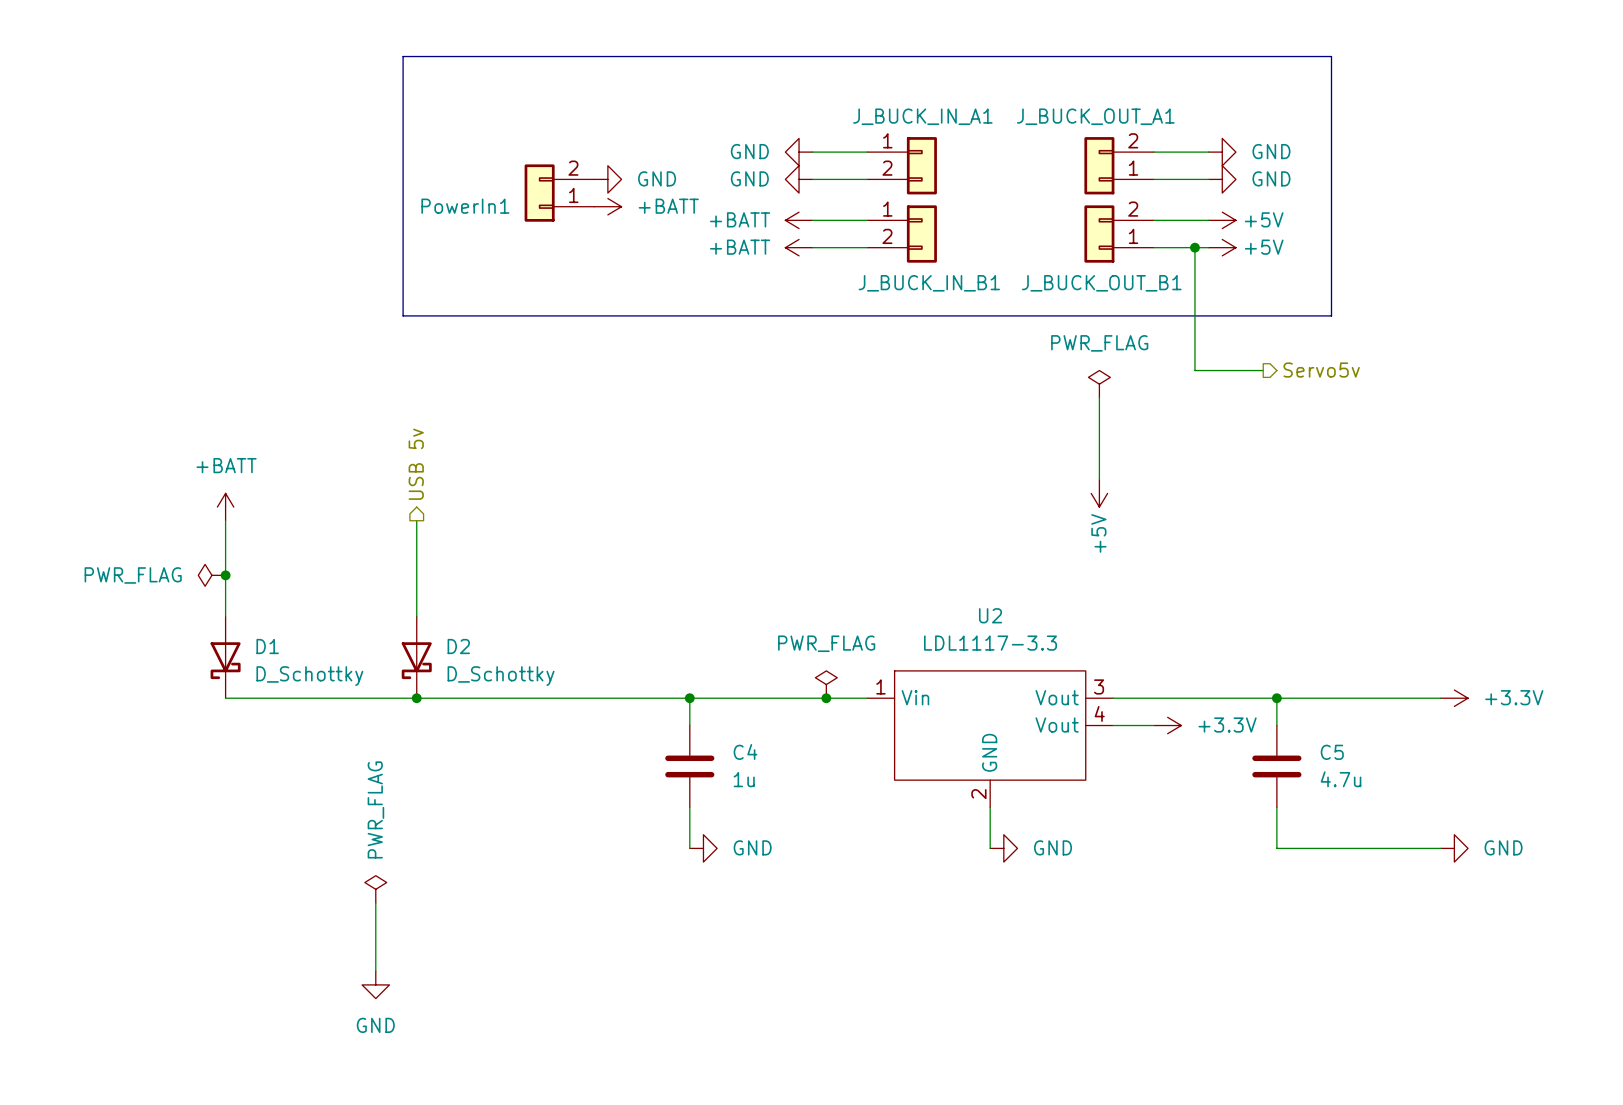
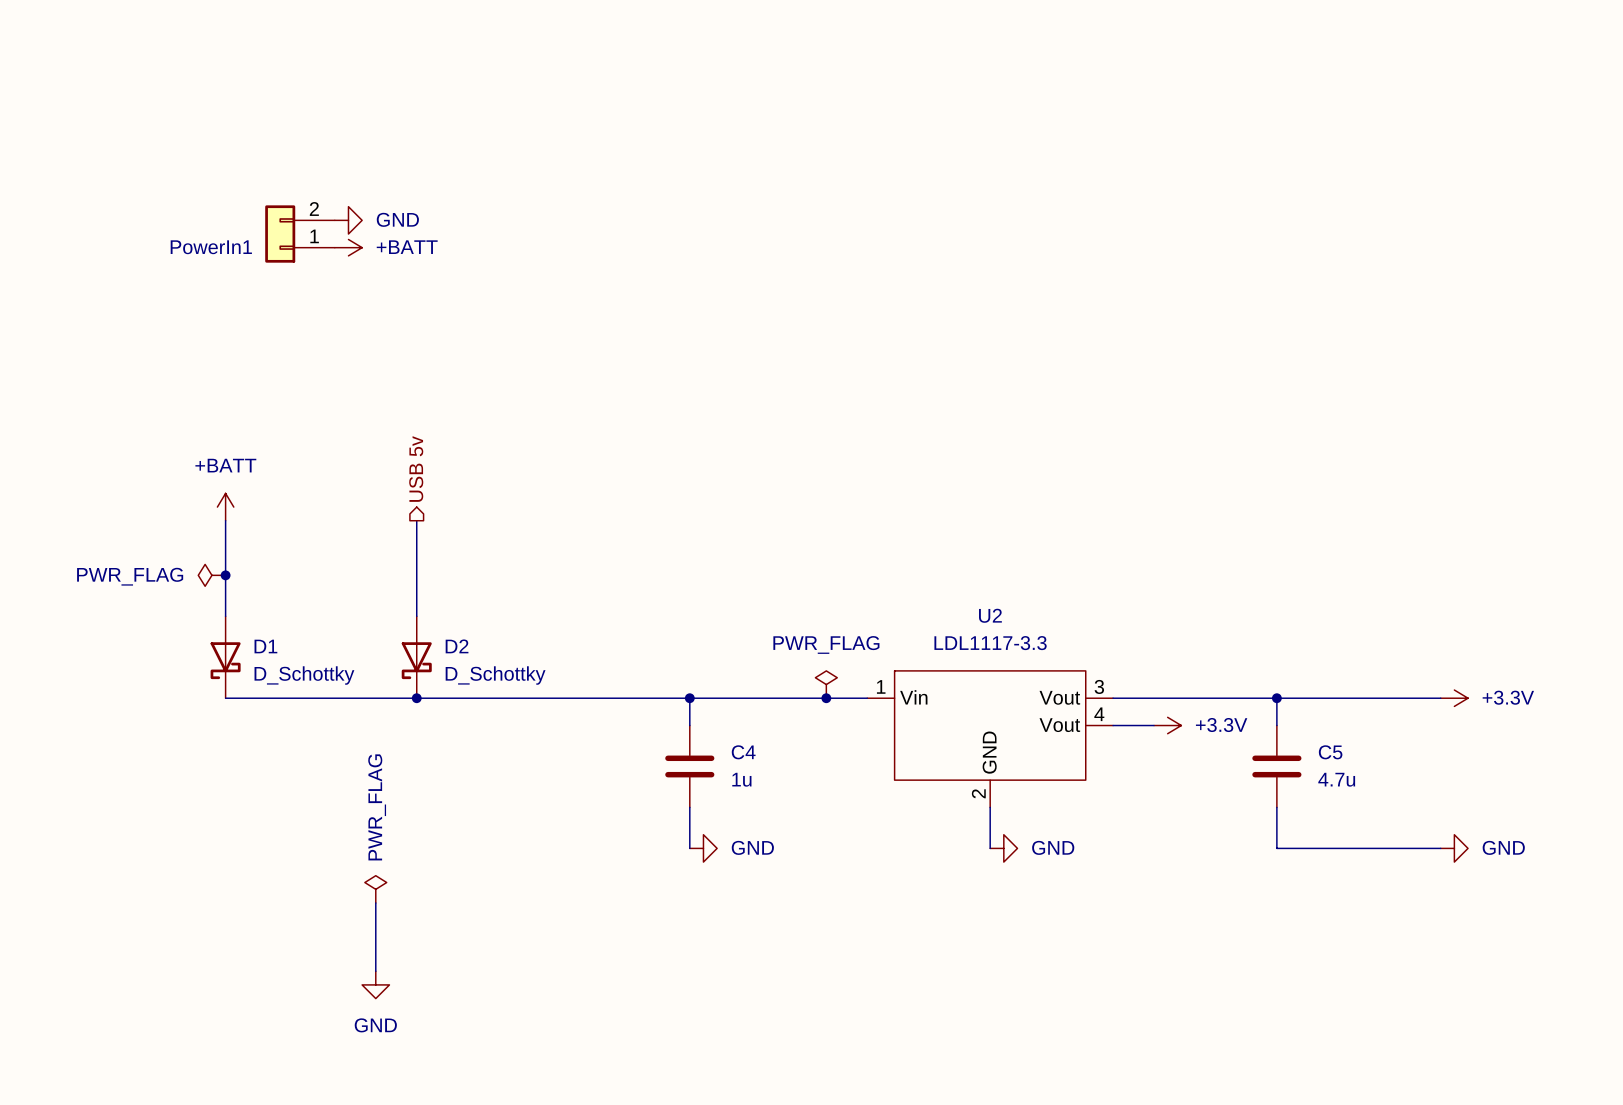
line: (403, 56) (1331, 56) (1331, 315) (403, 315) (403, 56) -> none
power symbol: GND (799, 152) -> none
wire: (812, 152) (867, 152) -> none
wire: (1154, 152) (1208, 152) -> none
power symbol: GND (1222, 152) -> none
J_BUCK_IN_A1: (902, 165) -> none
J_BUCK_OUT_A1: (1119, 165) -> none
power symbol: GND (607, 179) -> none
power symbol: GND (799, 179) -> none
wire: (812, 179) (867, 179) -> none
wire: (1154, 179) (1208, 179) -> none
power symbol: GND (1222, 179) -> none
PowerIn1 position: (559, 193) -> (300, 234)
power symbol: +BATT (607, 206) -> none
power symbol: none -> GND (348, 220)
power symbol: +BATT (799, 220) -> none
wire: (812, 220) (867, 220) -> none
wire: (1154, 220) (1208, 220) -> none
power symbol: +5V (1222, 220) -> none
J_BUCK_IN_B1: (902, 234) -> none
J_BUCK_OUT_B1: (1119, 234) -> none
power symbol: none -> +BATT (348, 247)
power symbol: +BATT (799, 247) -> none
wire: (812, 247) (867, 247) -> none
wire: (1154, 247) (1208, 247) -> none
wire: (1194, 247) (1194, 370) (1263, 370) -> none
junction: (1194, 247) -> none
power symbol: +5V (1222, 247) -> none
hierarchical label: Servo5v (1321, 370) -> none
power symbol: PWR_FLAG (1099, 384) -> none
wire: (1099, 397) (1099, 479) -> none
power symbol: +5V (1099, 493) -> none

